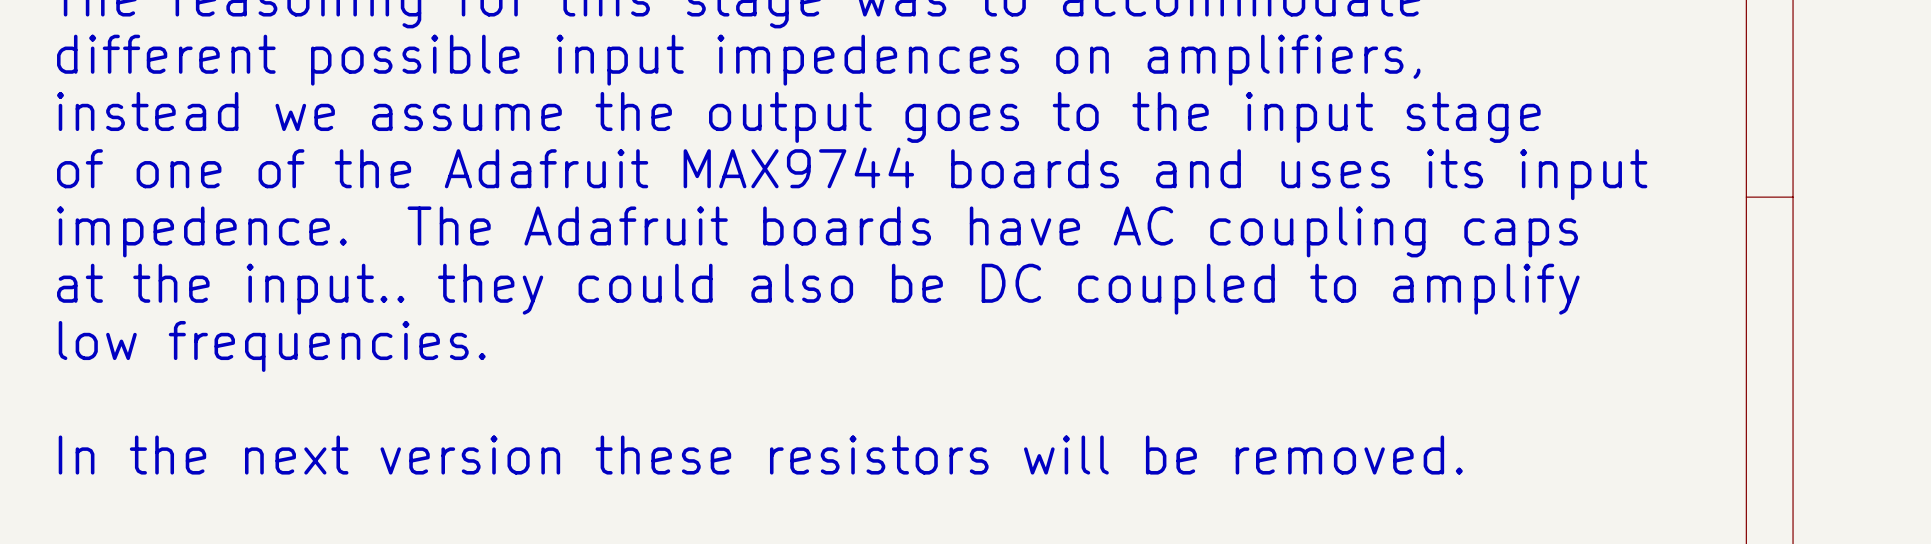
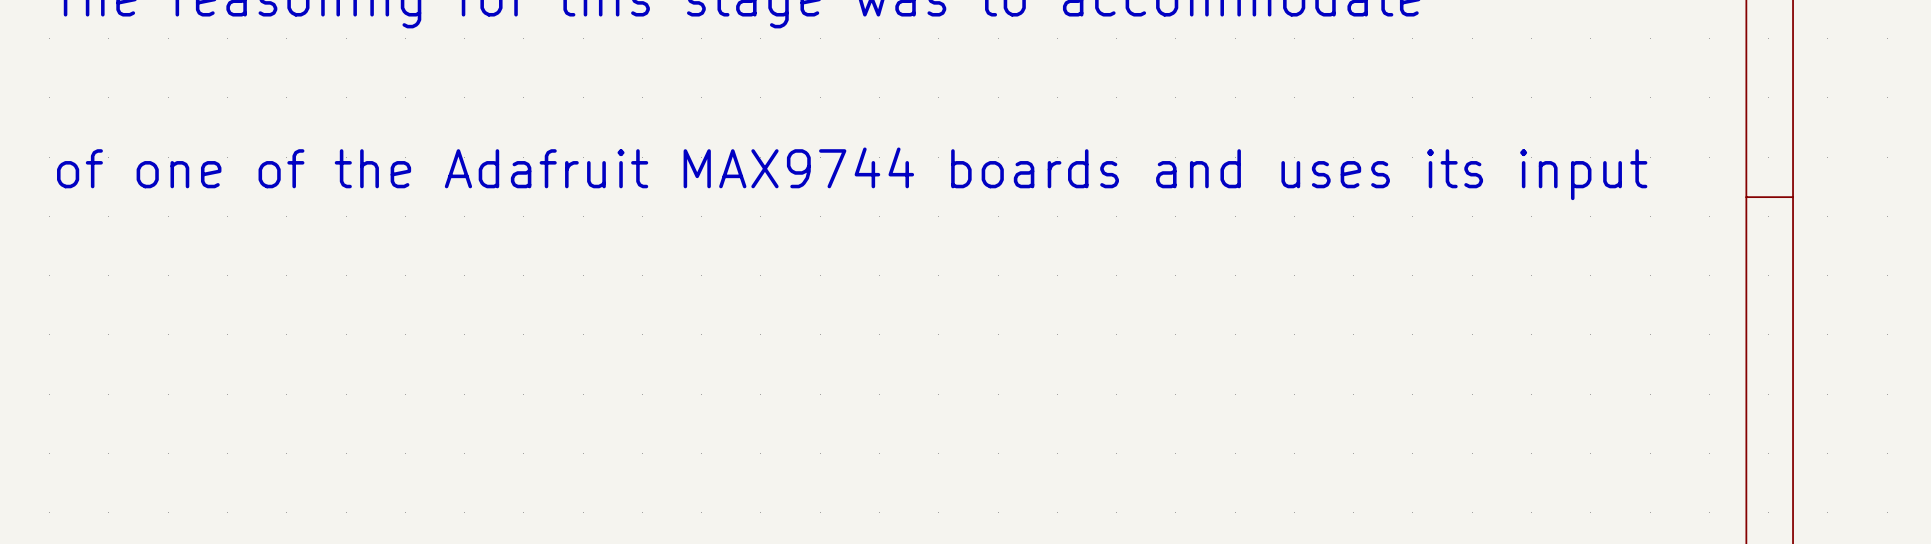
text: different possible input impedences on amplifiers, (738, 60) -> none
text: instead we assume the output goes to the input stage (798, 117) -> none
text: impedence. The Adafruit boards have AC coupling caps (817, 231) -> none
text: at the input.. they could also be DC coupled to amplify (818, 289) -> none
text: low frequencies. (272, 346) -> none
text: In the next version these resistors will be removed. (760, 455) -> none

